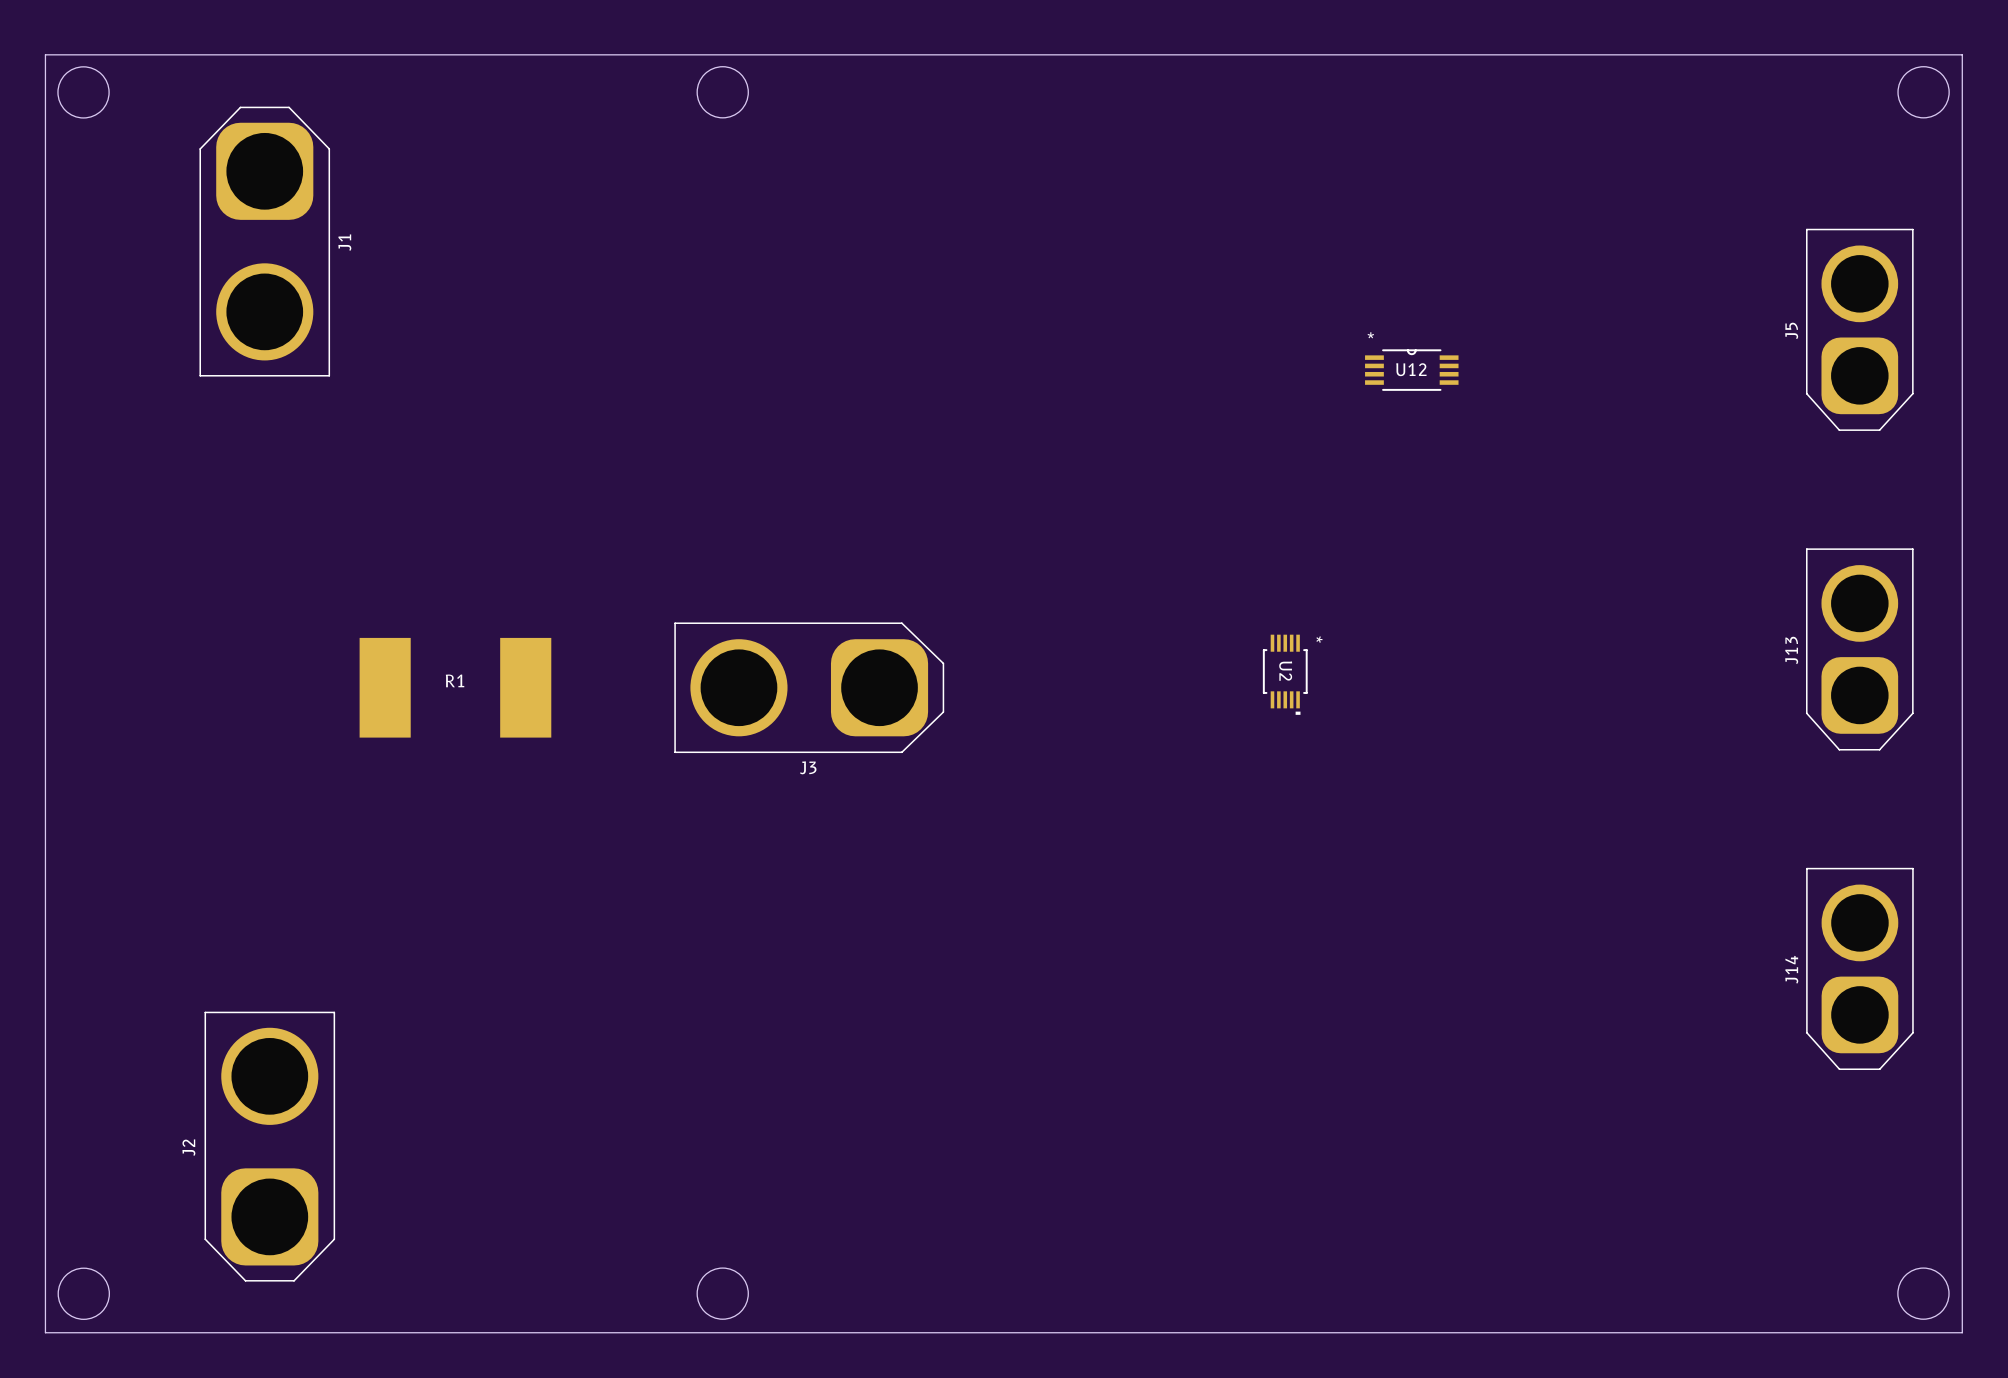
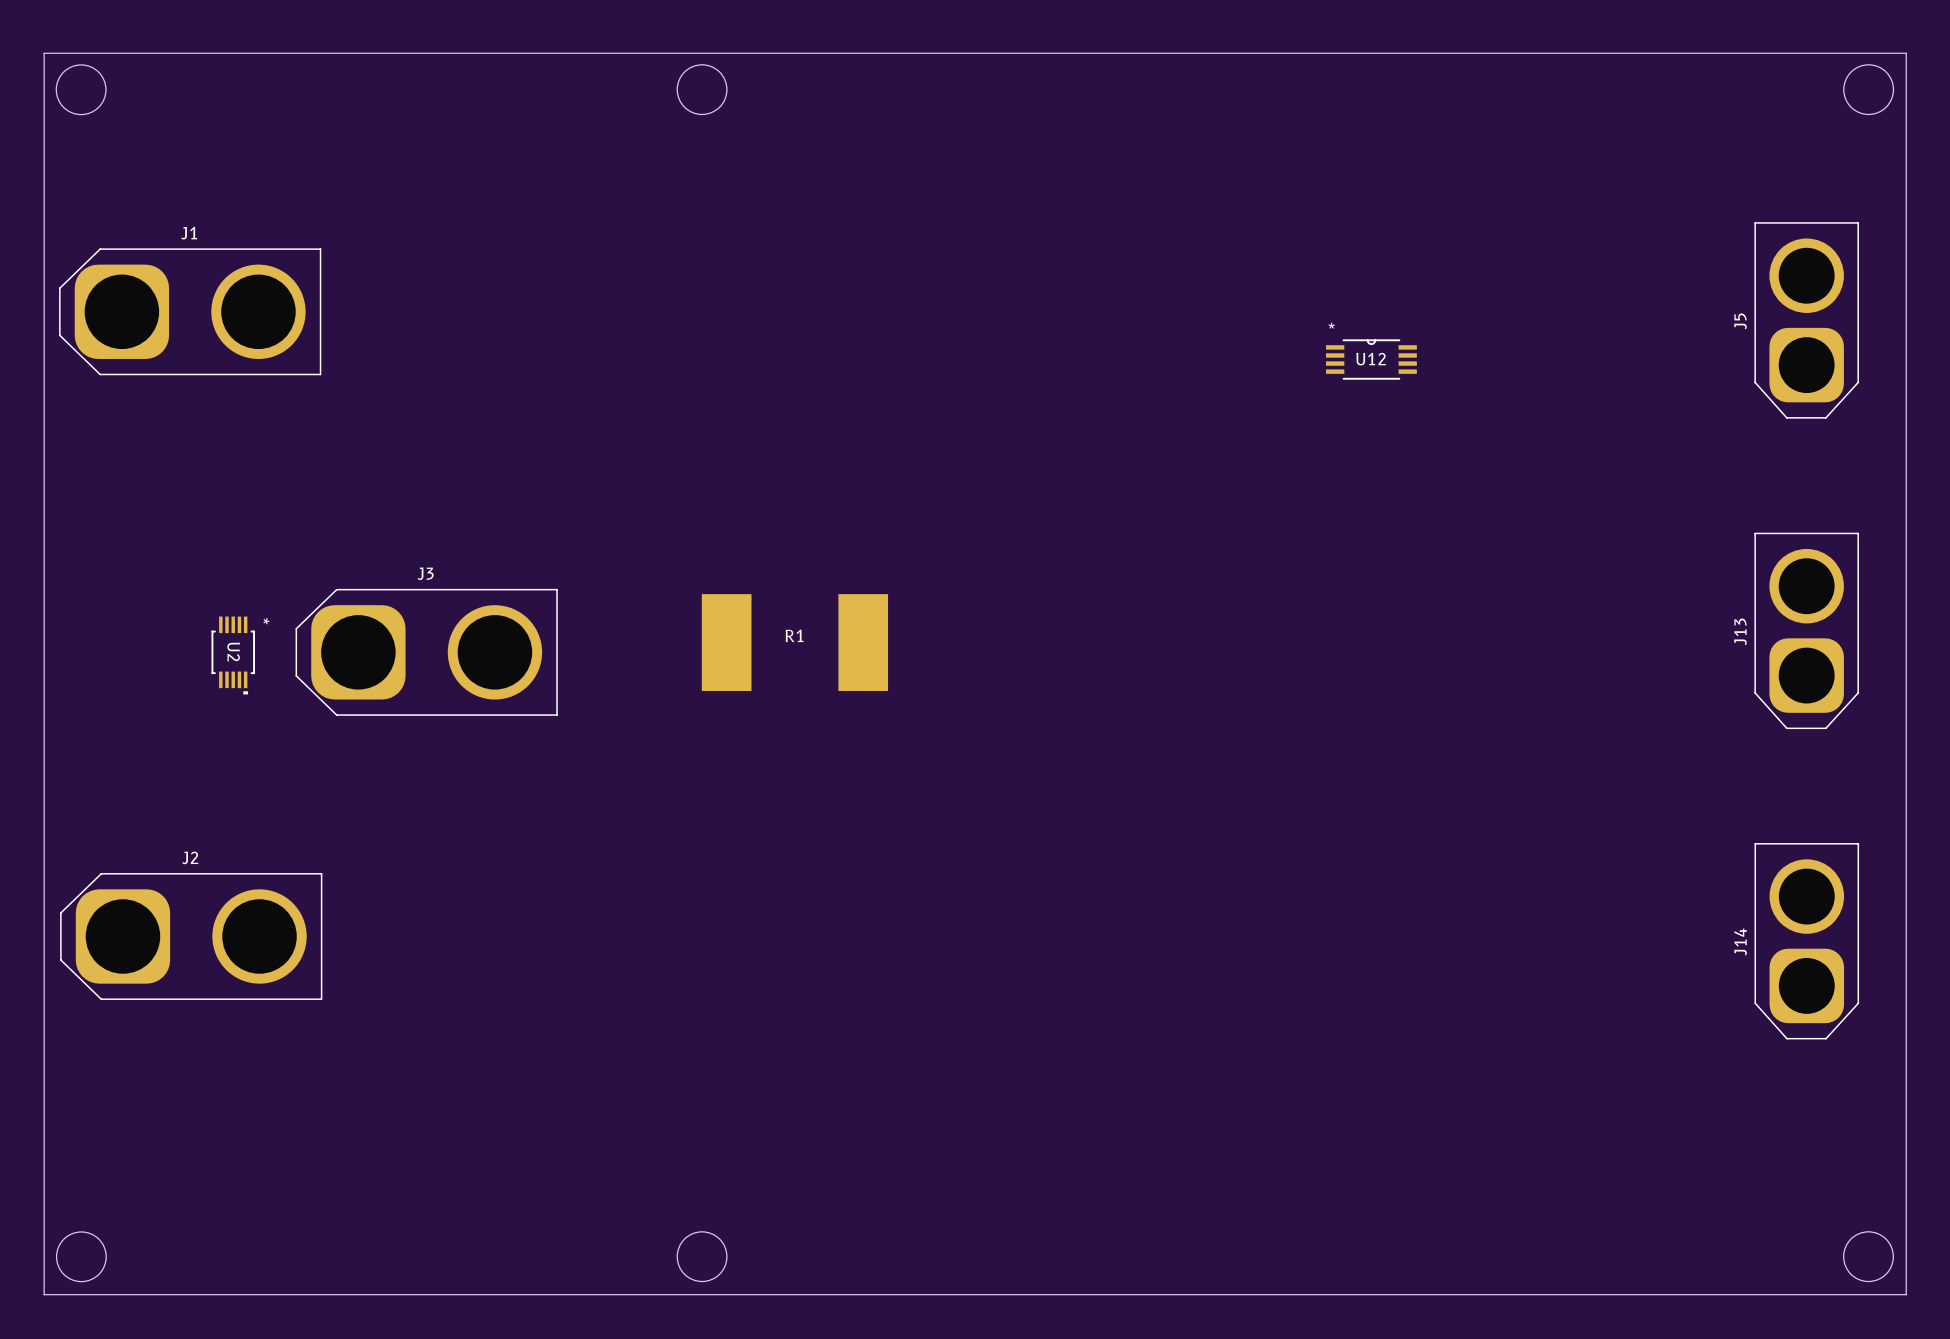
J1 rotation: 0° (264, 241) -> 90° counterclockwise (190, 311)
U2 position: (1285, 674) -> (233, 655)
R1 position: (455, 687) -> (794, 642)
J3 rotation: 0° (809, 687) -> 180° (426, 652)
J3 position: (809, 687) -> (426, 652)
J2 rotation: 0° (269, 1146) -> 90° clockwise (191, 936)
J2 position: (269, 1146) -> (191, 936)

